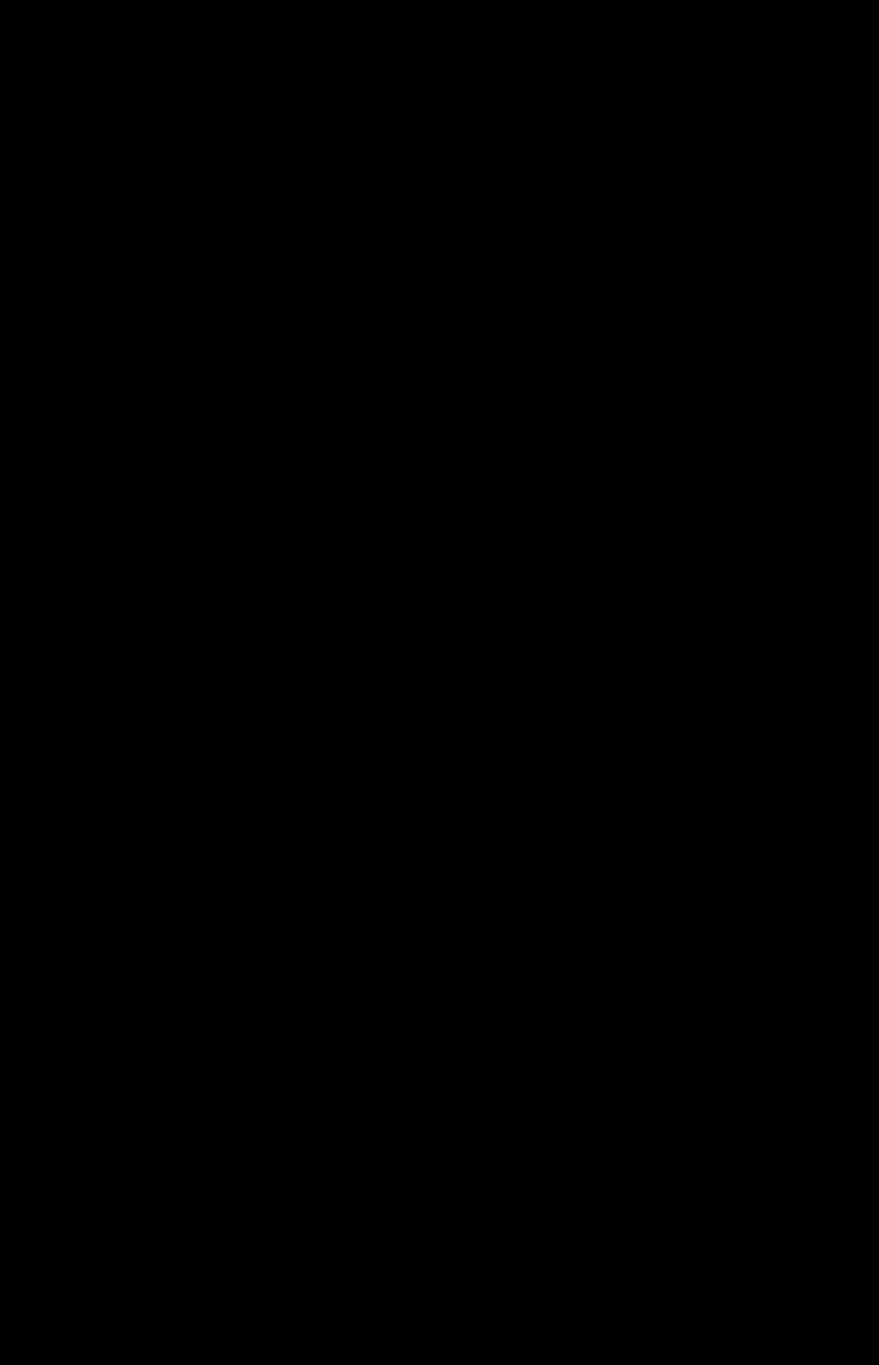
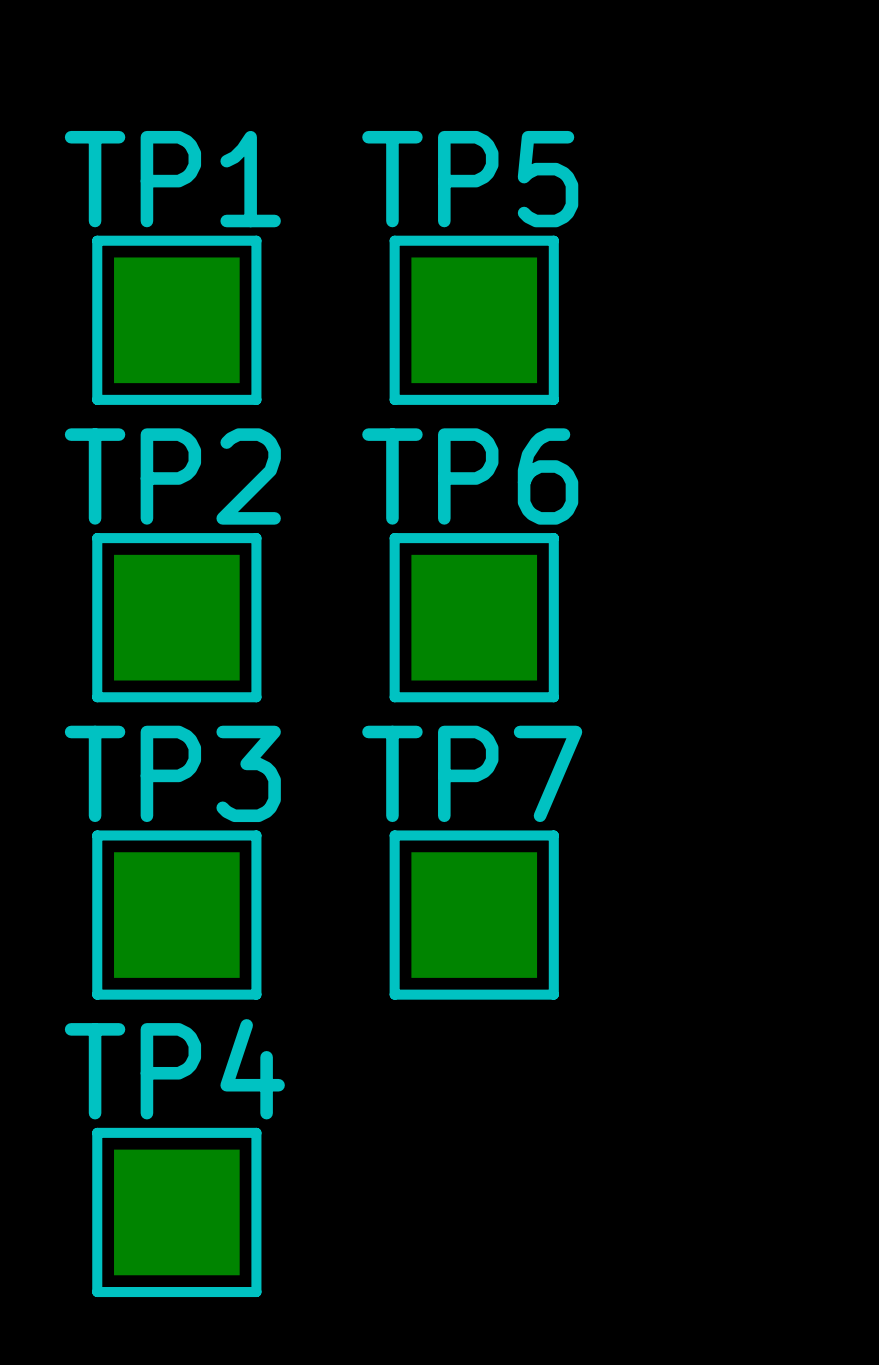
TP1: none -> (176, 320)
TP5: none -> (474, 320)
TP2: none -> (176, 617)
TP6: none -> (474, 617)
TP3: none -> (176, 915)
TP7: none -> (474, 915)
TP4: none -> (176, 1212)

